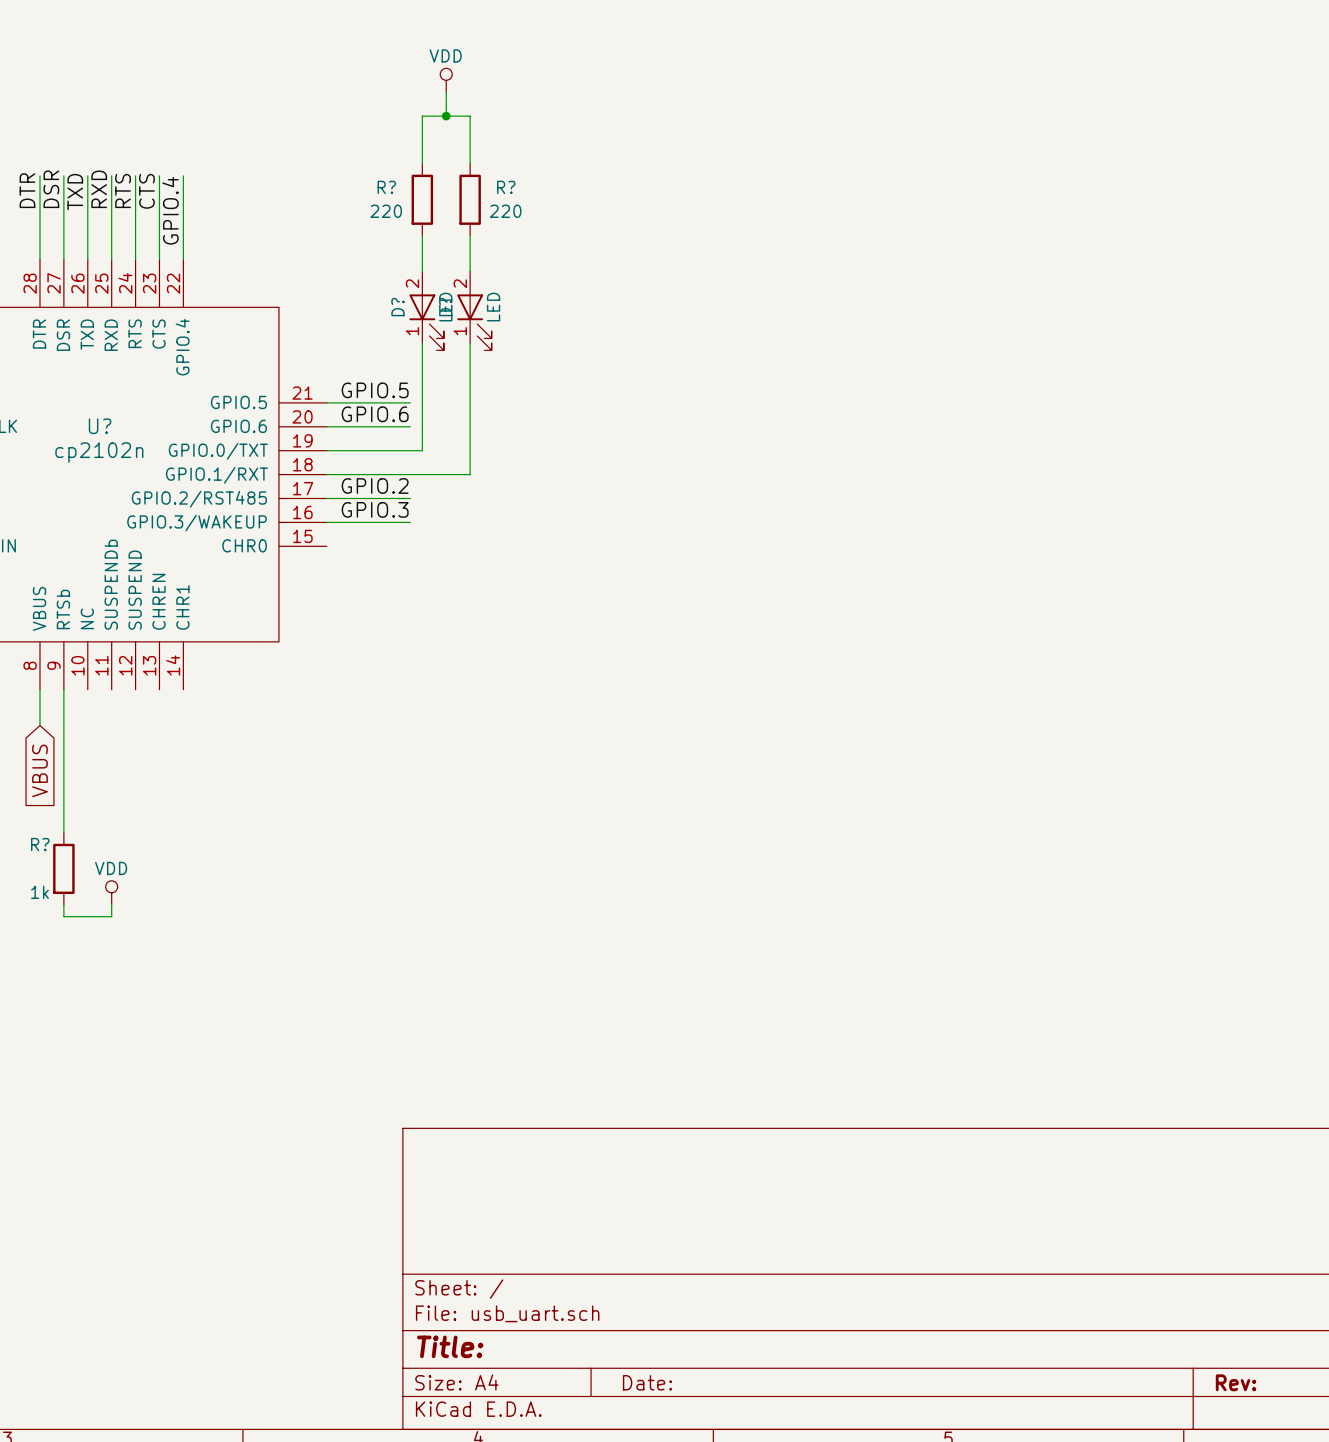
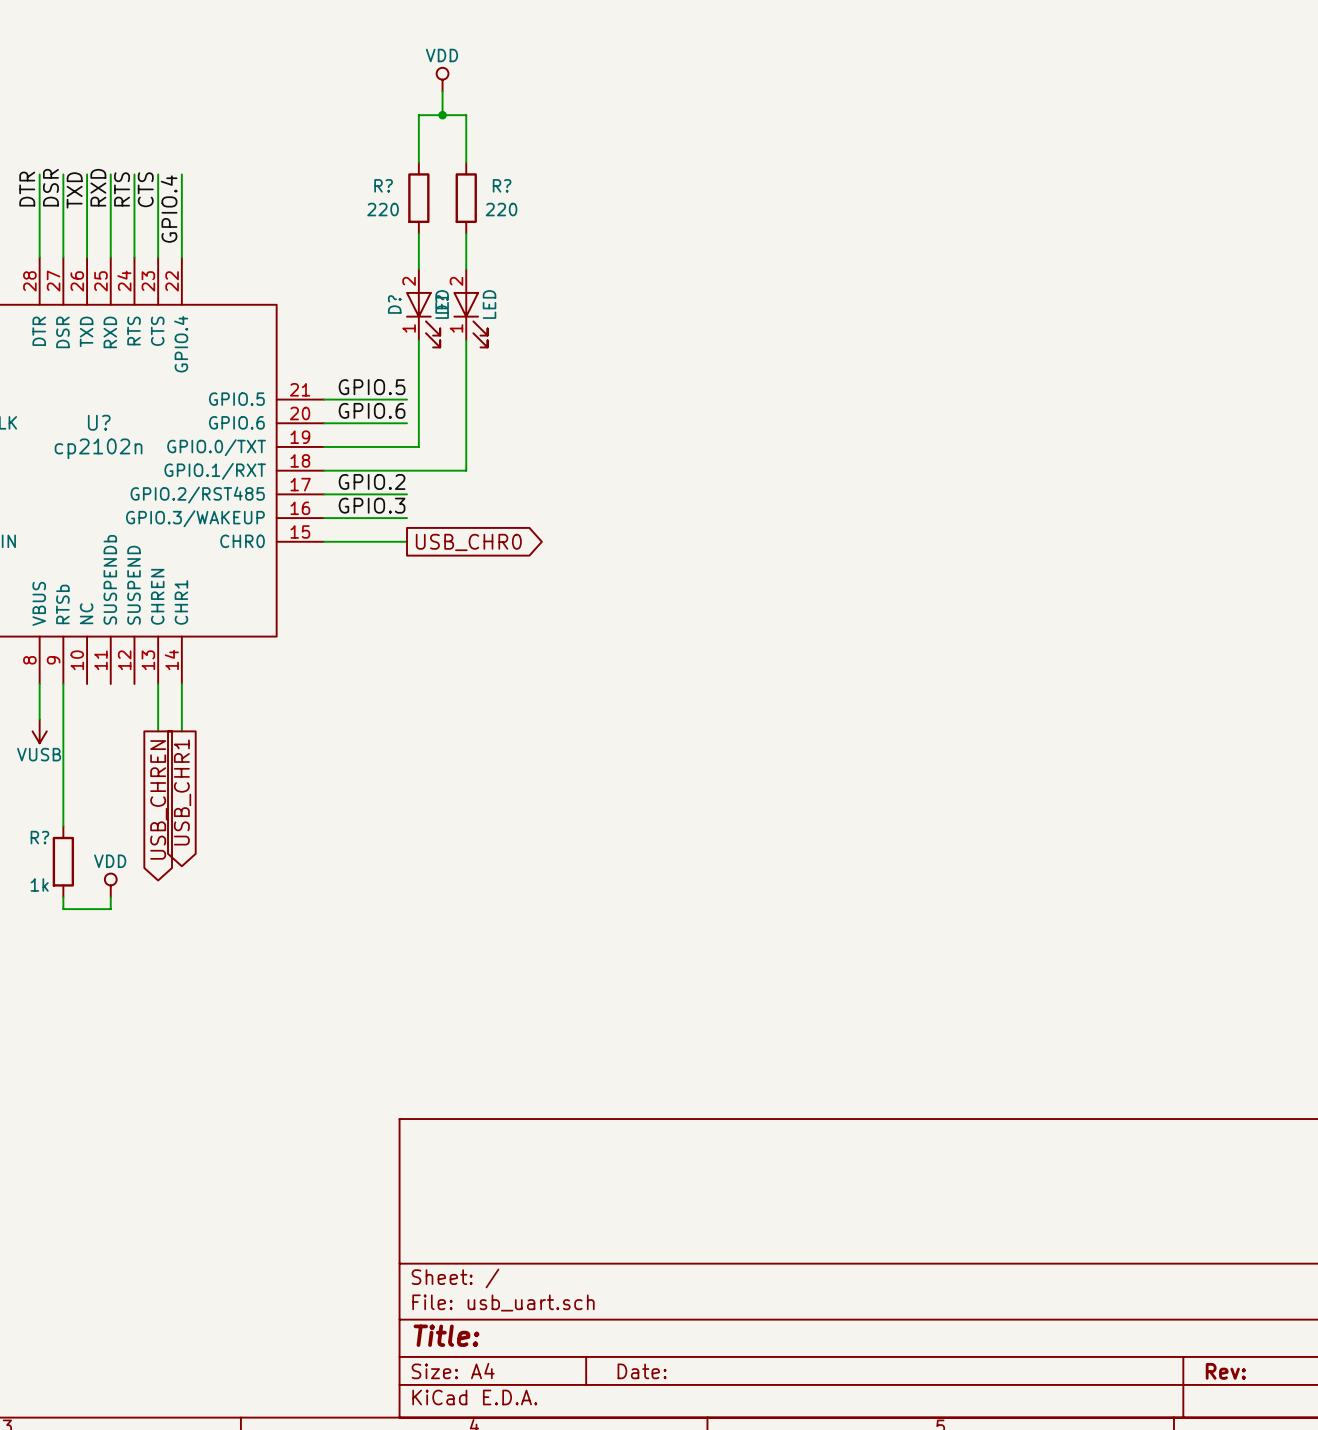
wire: none -> (324, 541) (407, 541)
global label: none -> USB_CHR0 (468, 542)
wire: none -> (158, 683) (158, 731)
wire: none -> (181, 683) (181, 731)
power symbol: none -> VUSB (39, 731)
global label: VBUS (39, 770) -> none
global label: none -> USB_CHR1 (182, 792)
global label: none -> USB_CHREN (158, 799)

